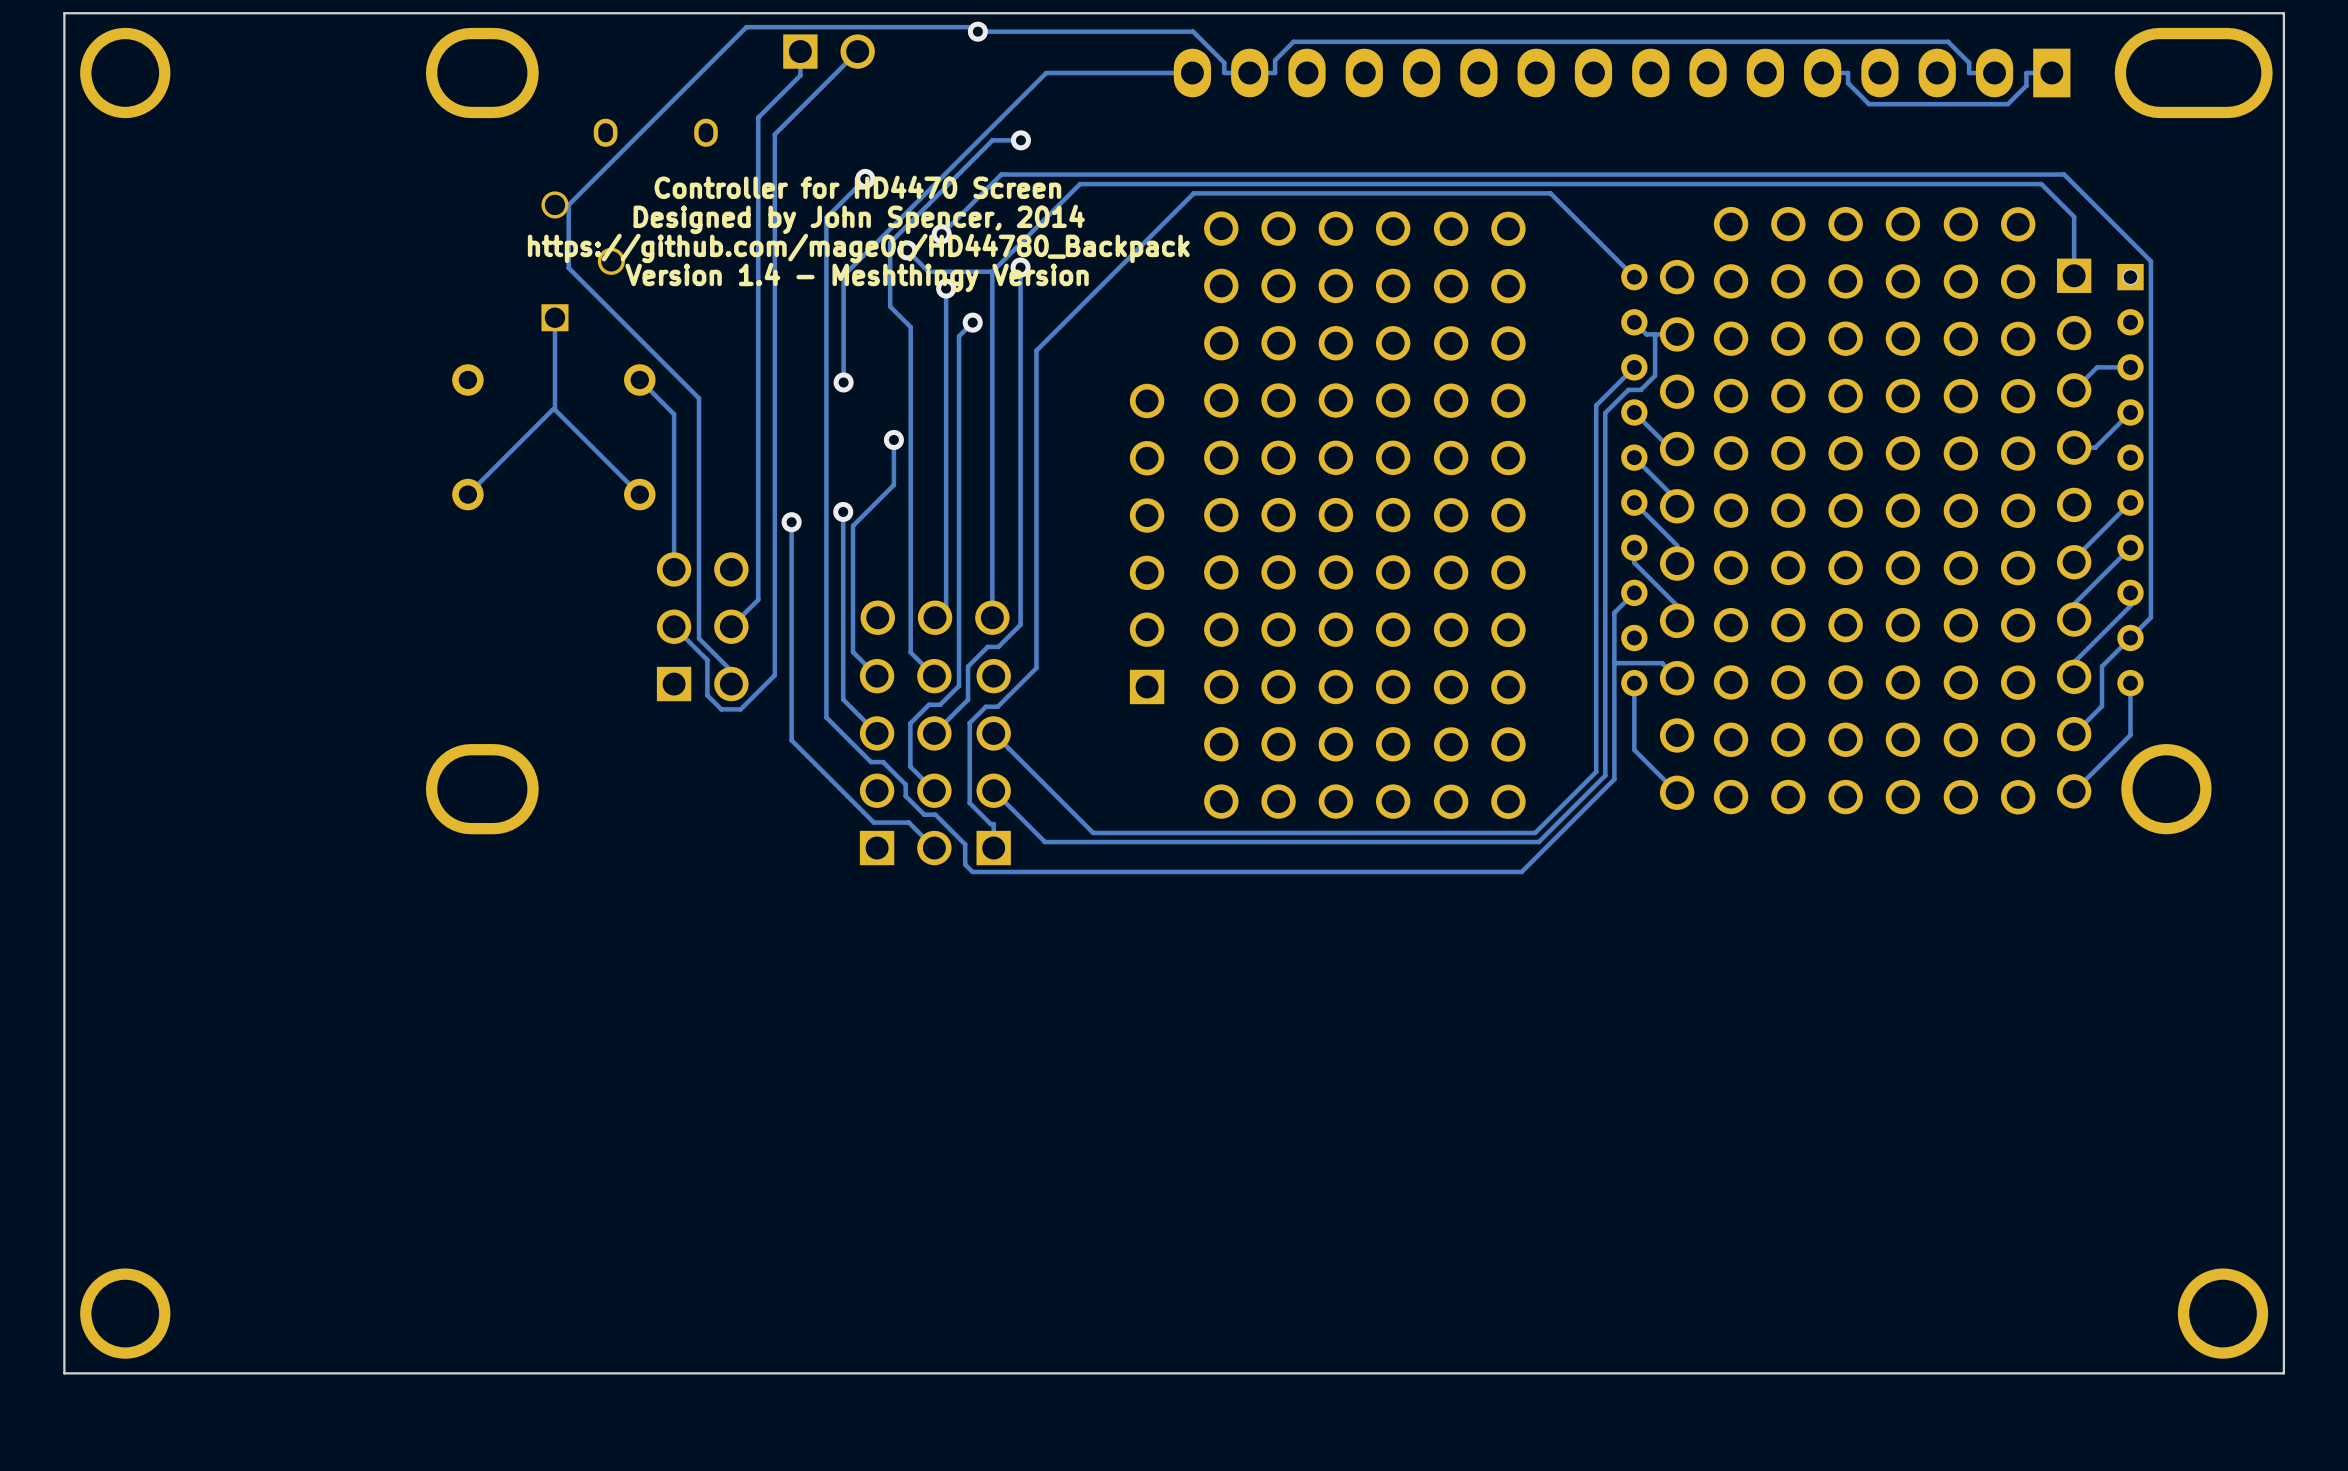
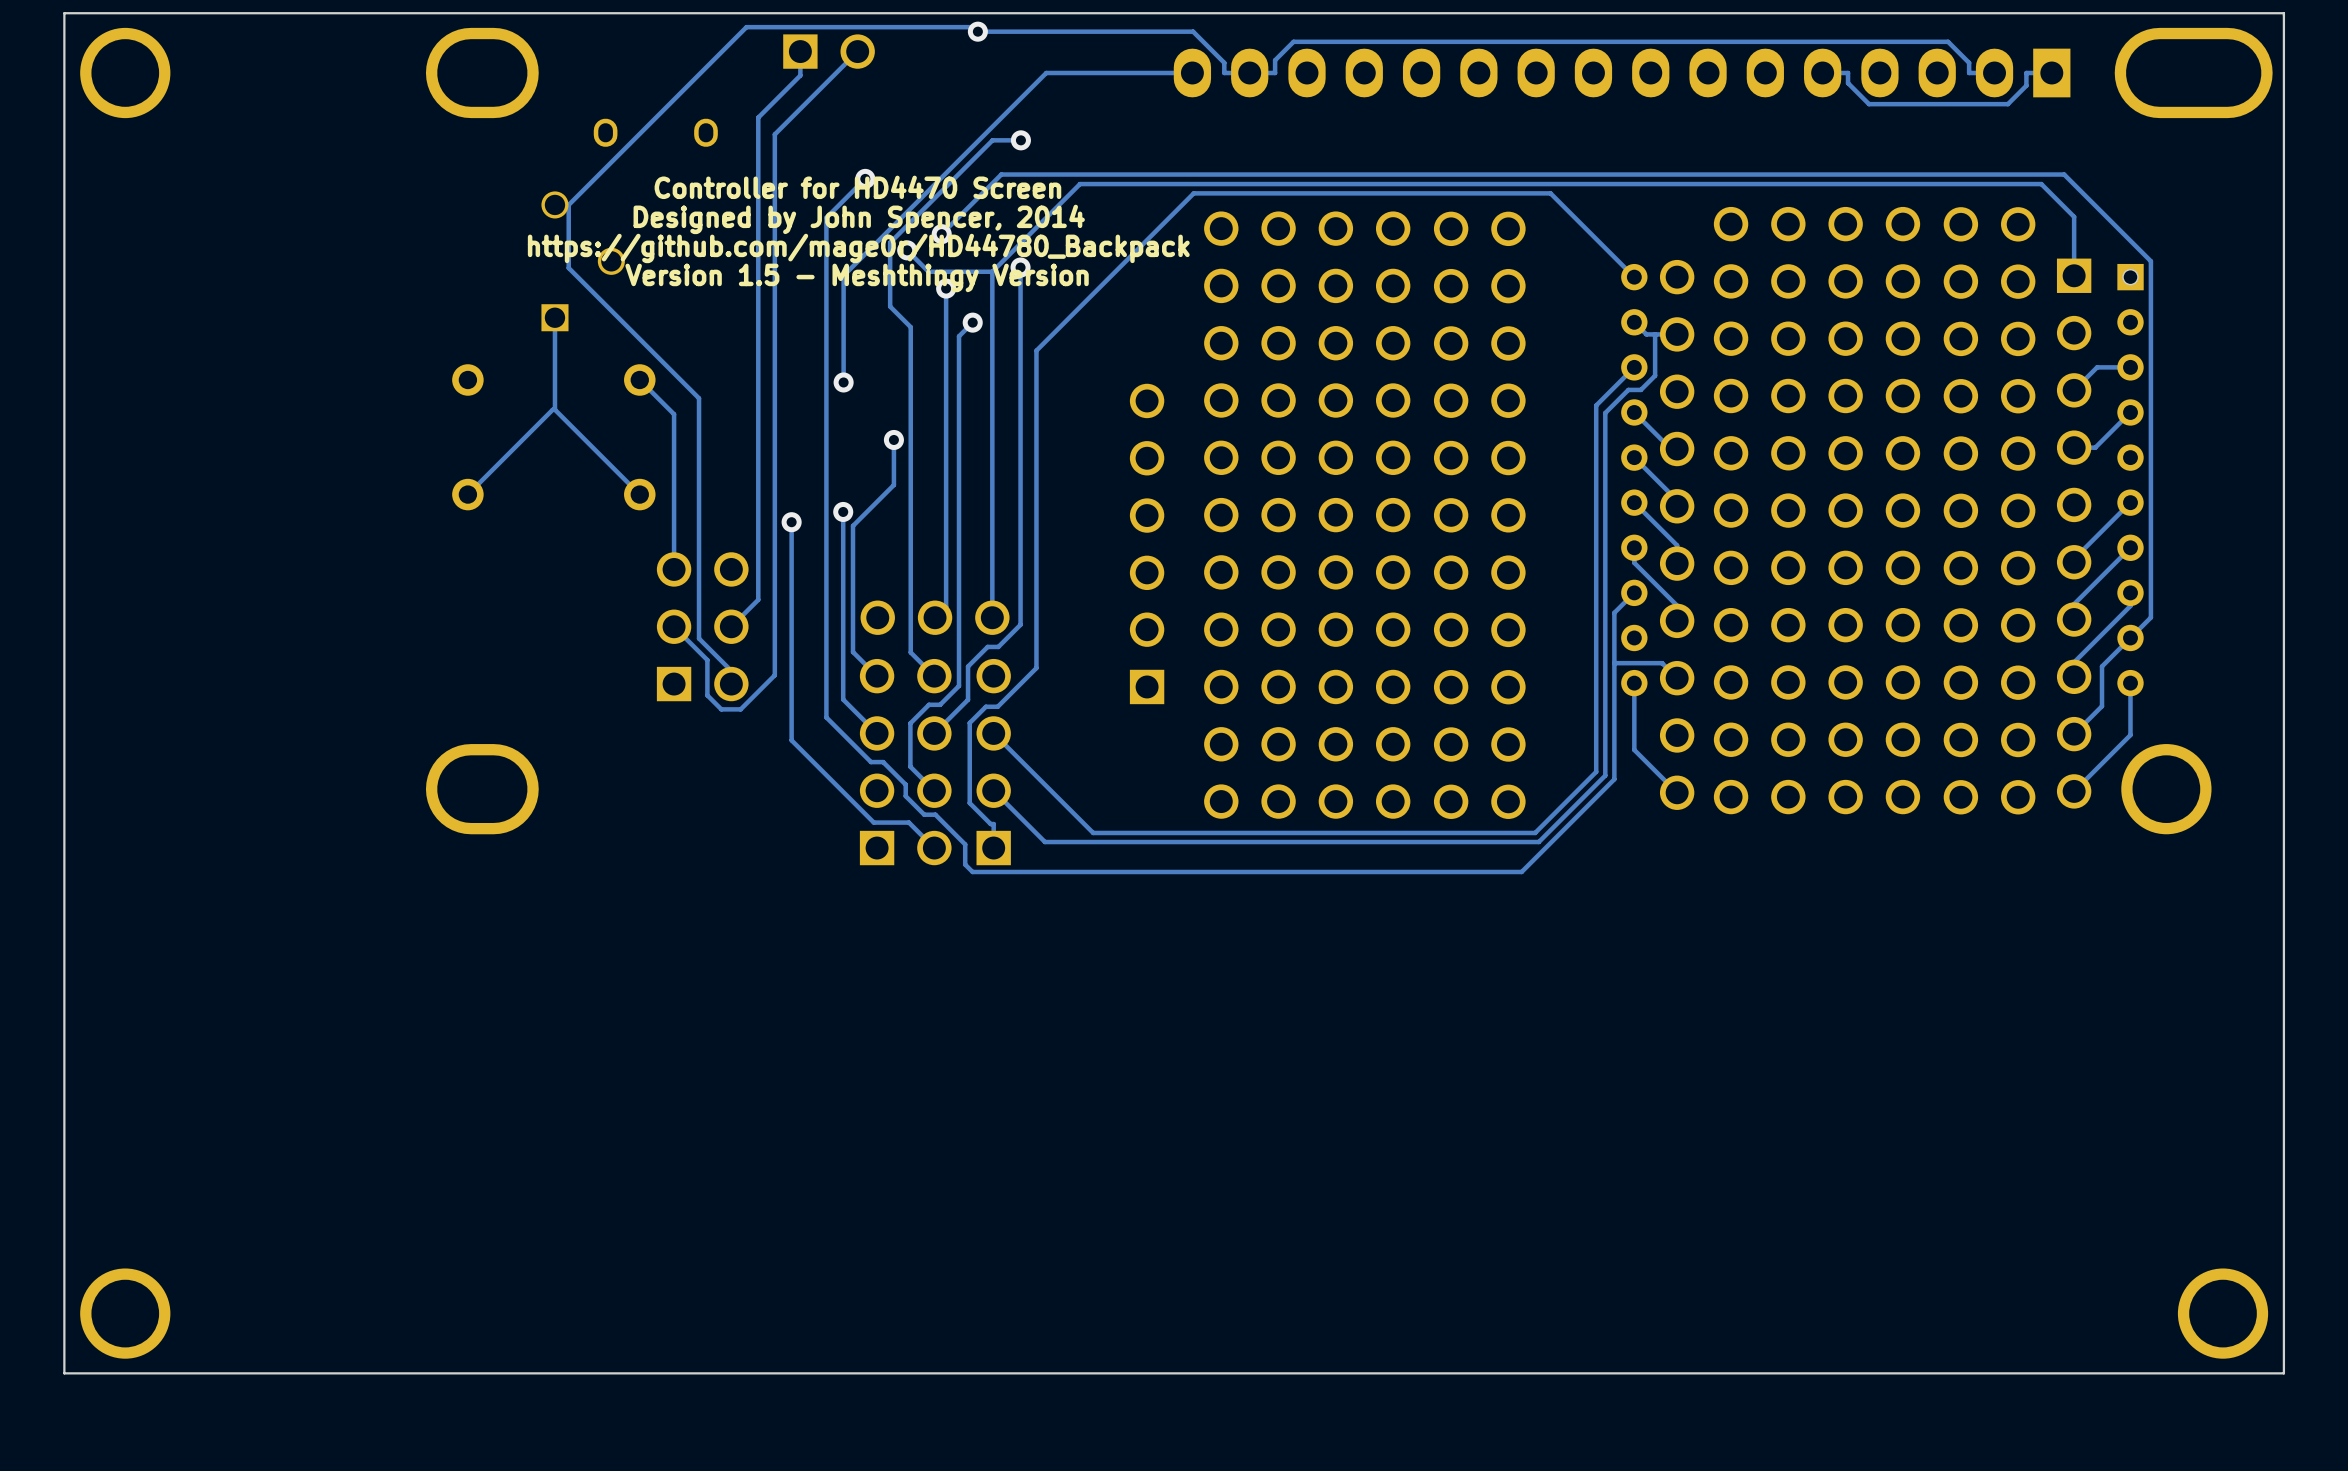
text: Version 1.4 - Meshthingy Version (857, 277) -> Version 1.5 - Meshthingy Version (857, 277)

